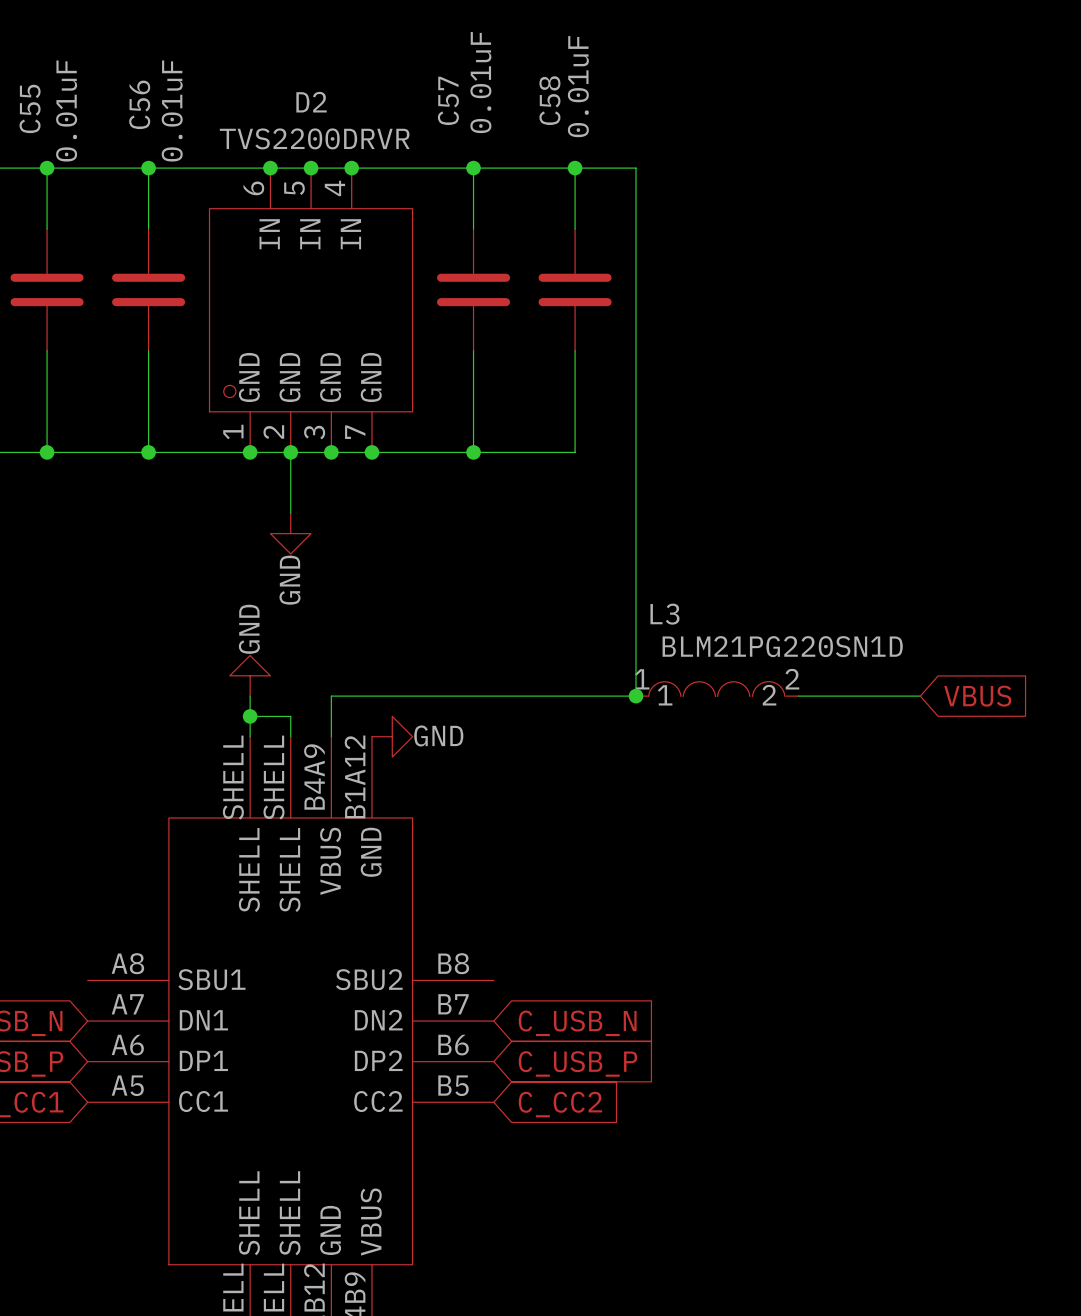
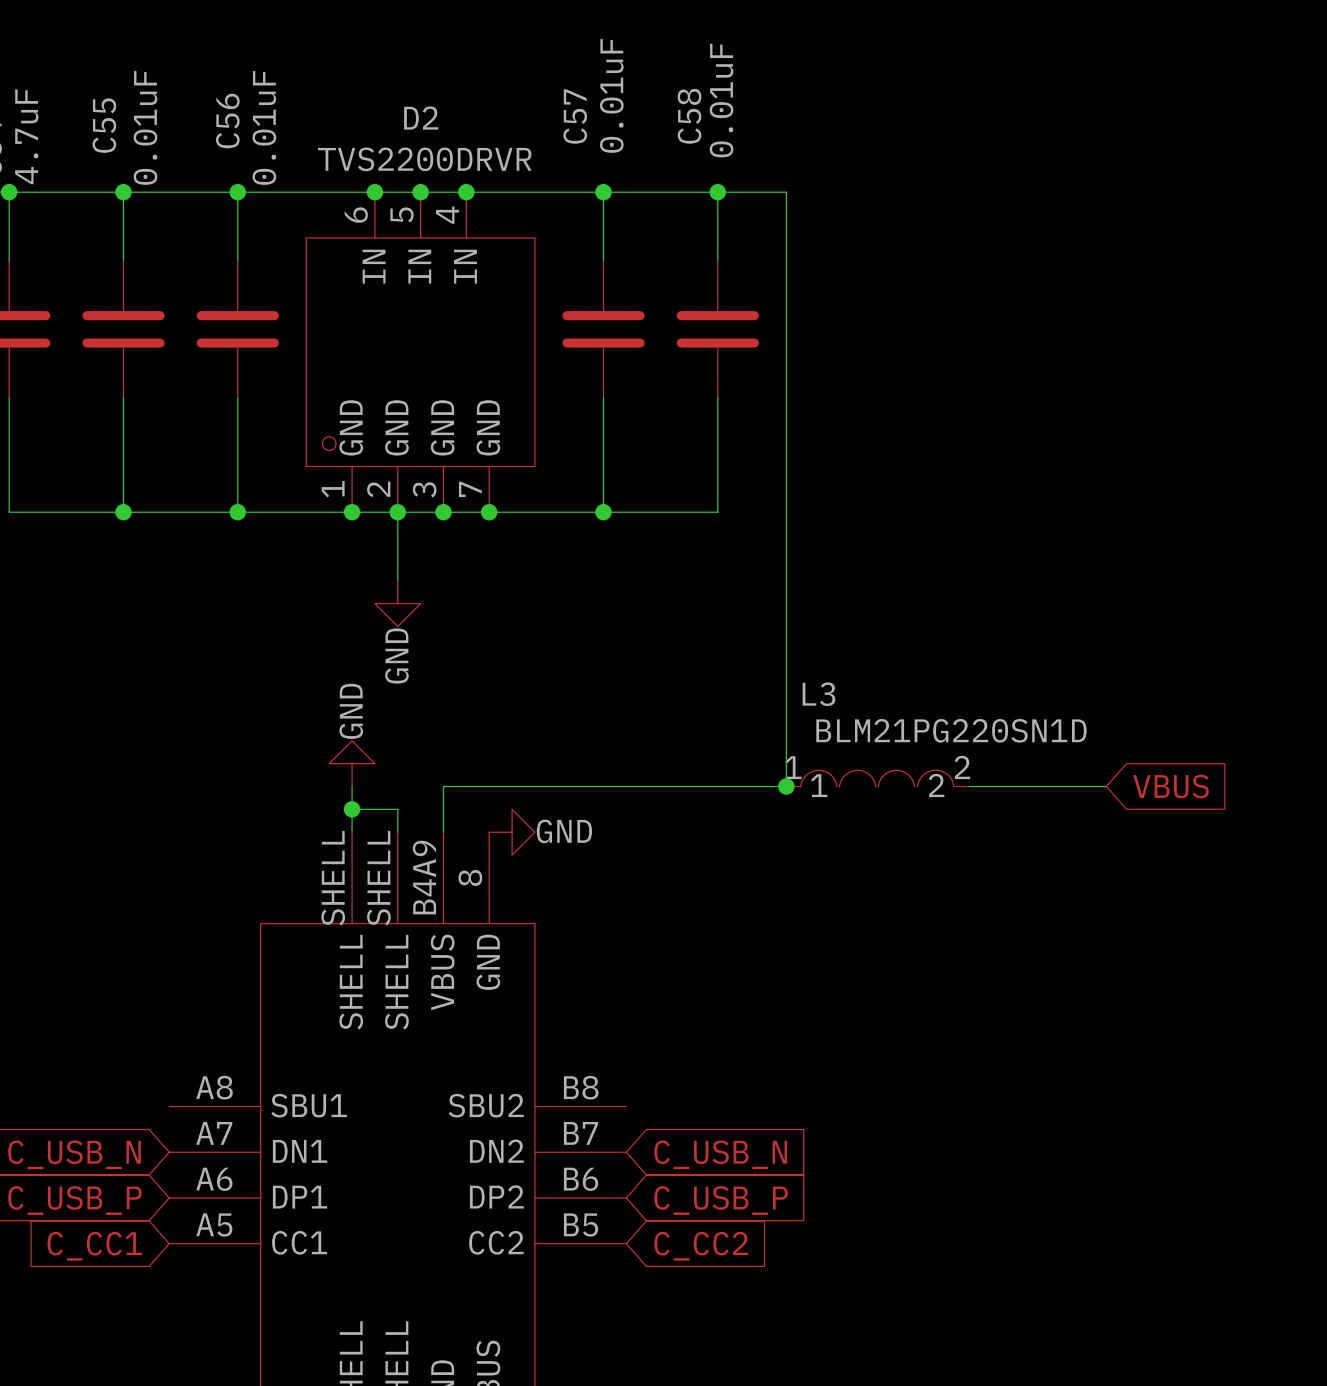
part pin number: B1A12 (355, 776) -> 8 (470, 877)

